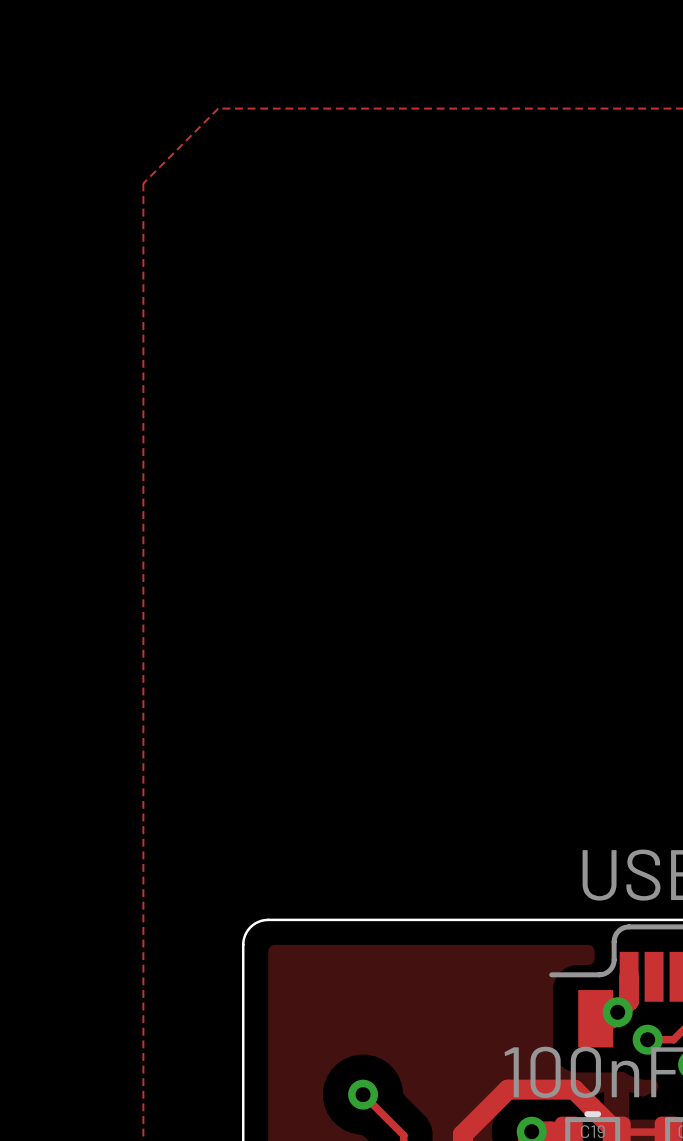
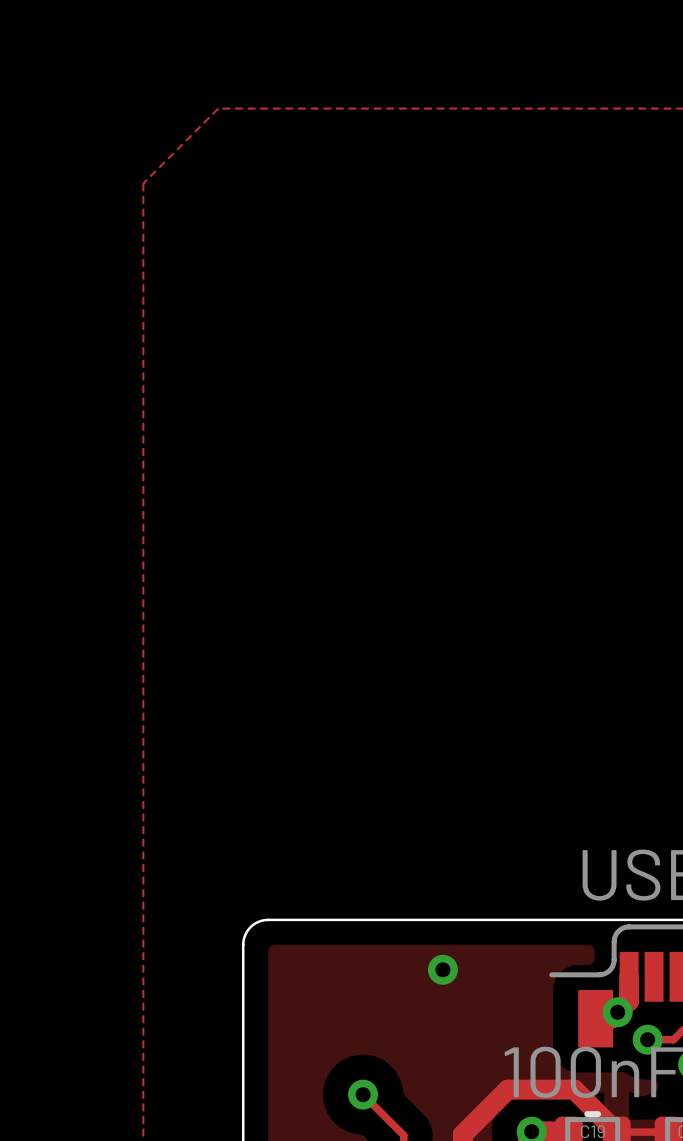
via: none -> (442, 969)

